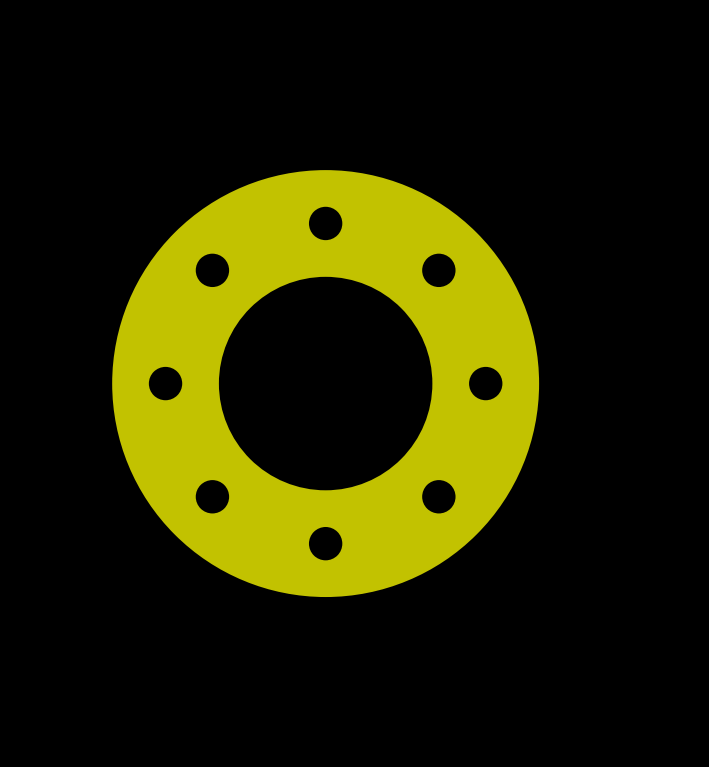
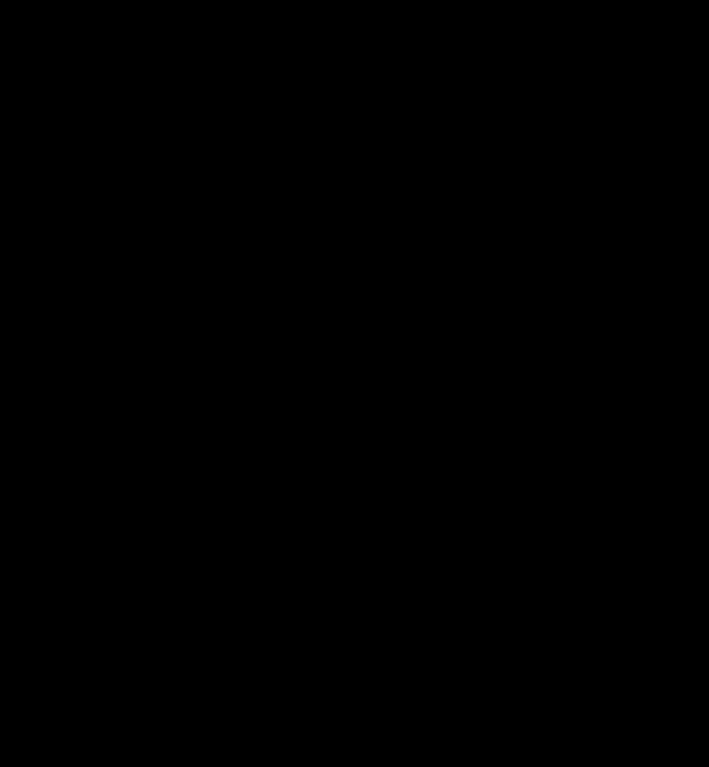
part: (325, 383) -> none

